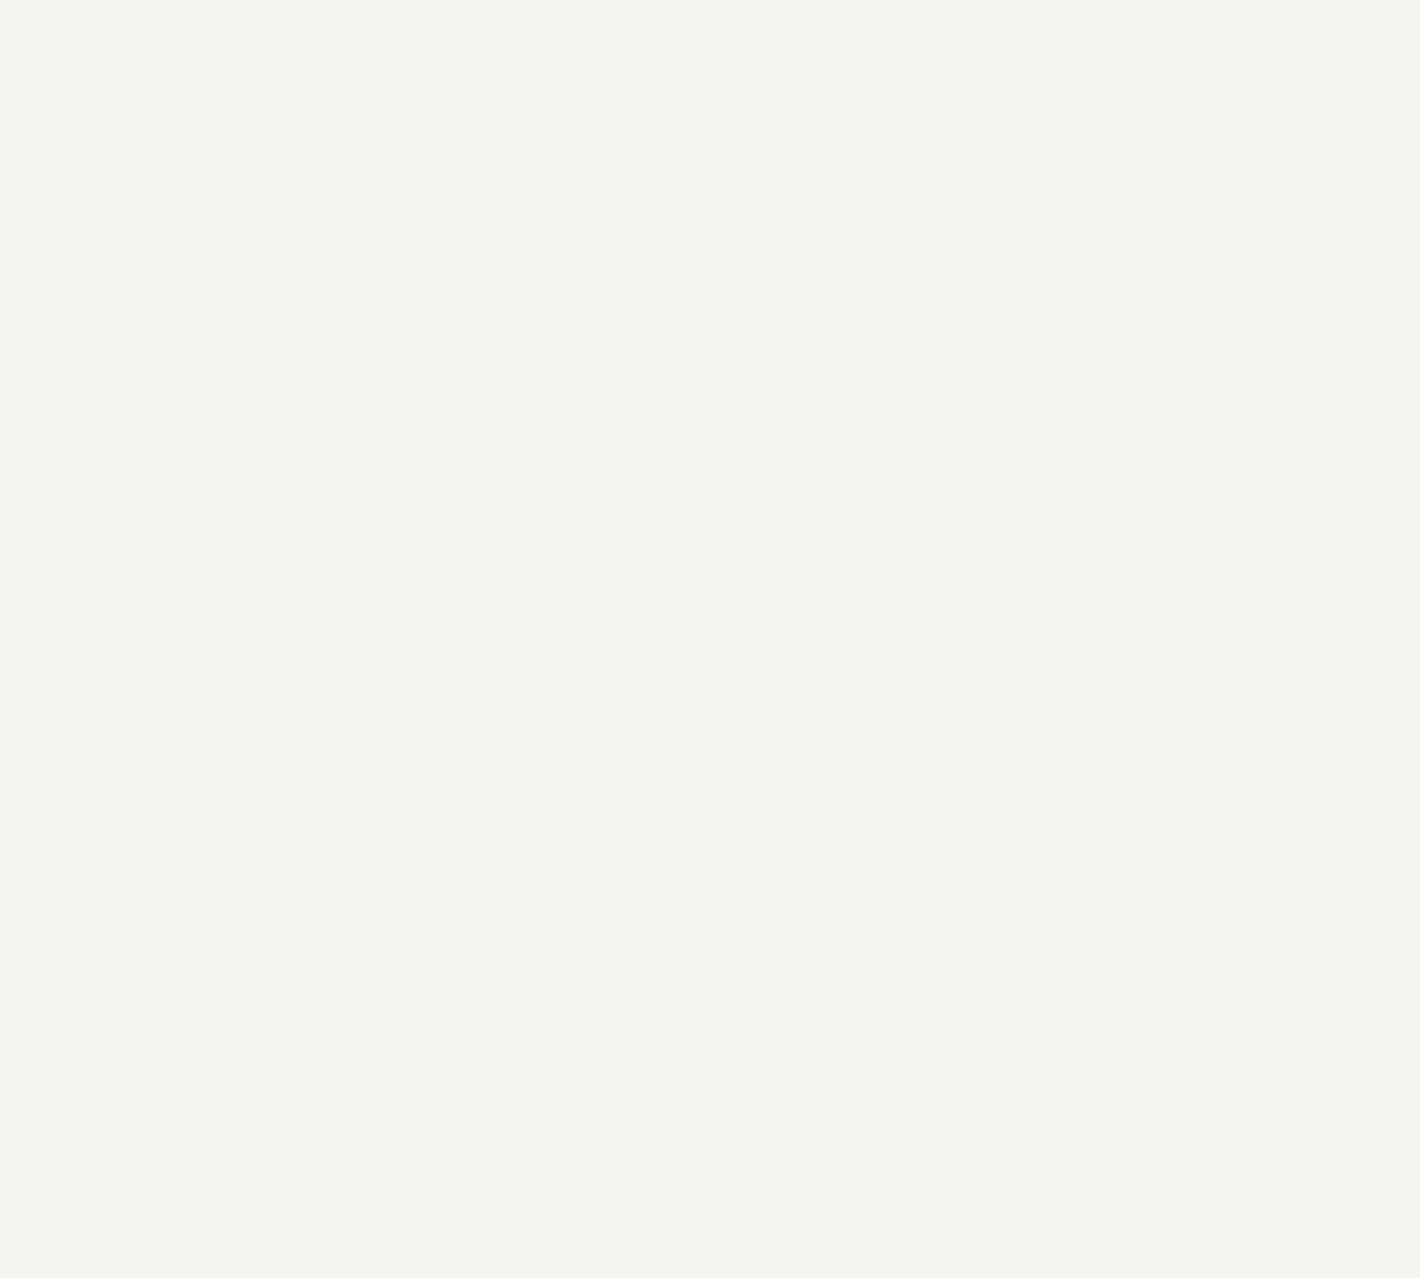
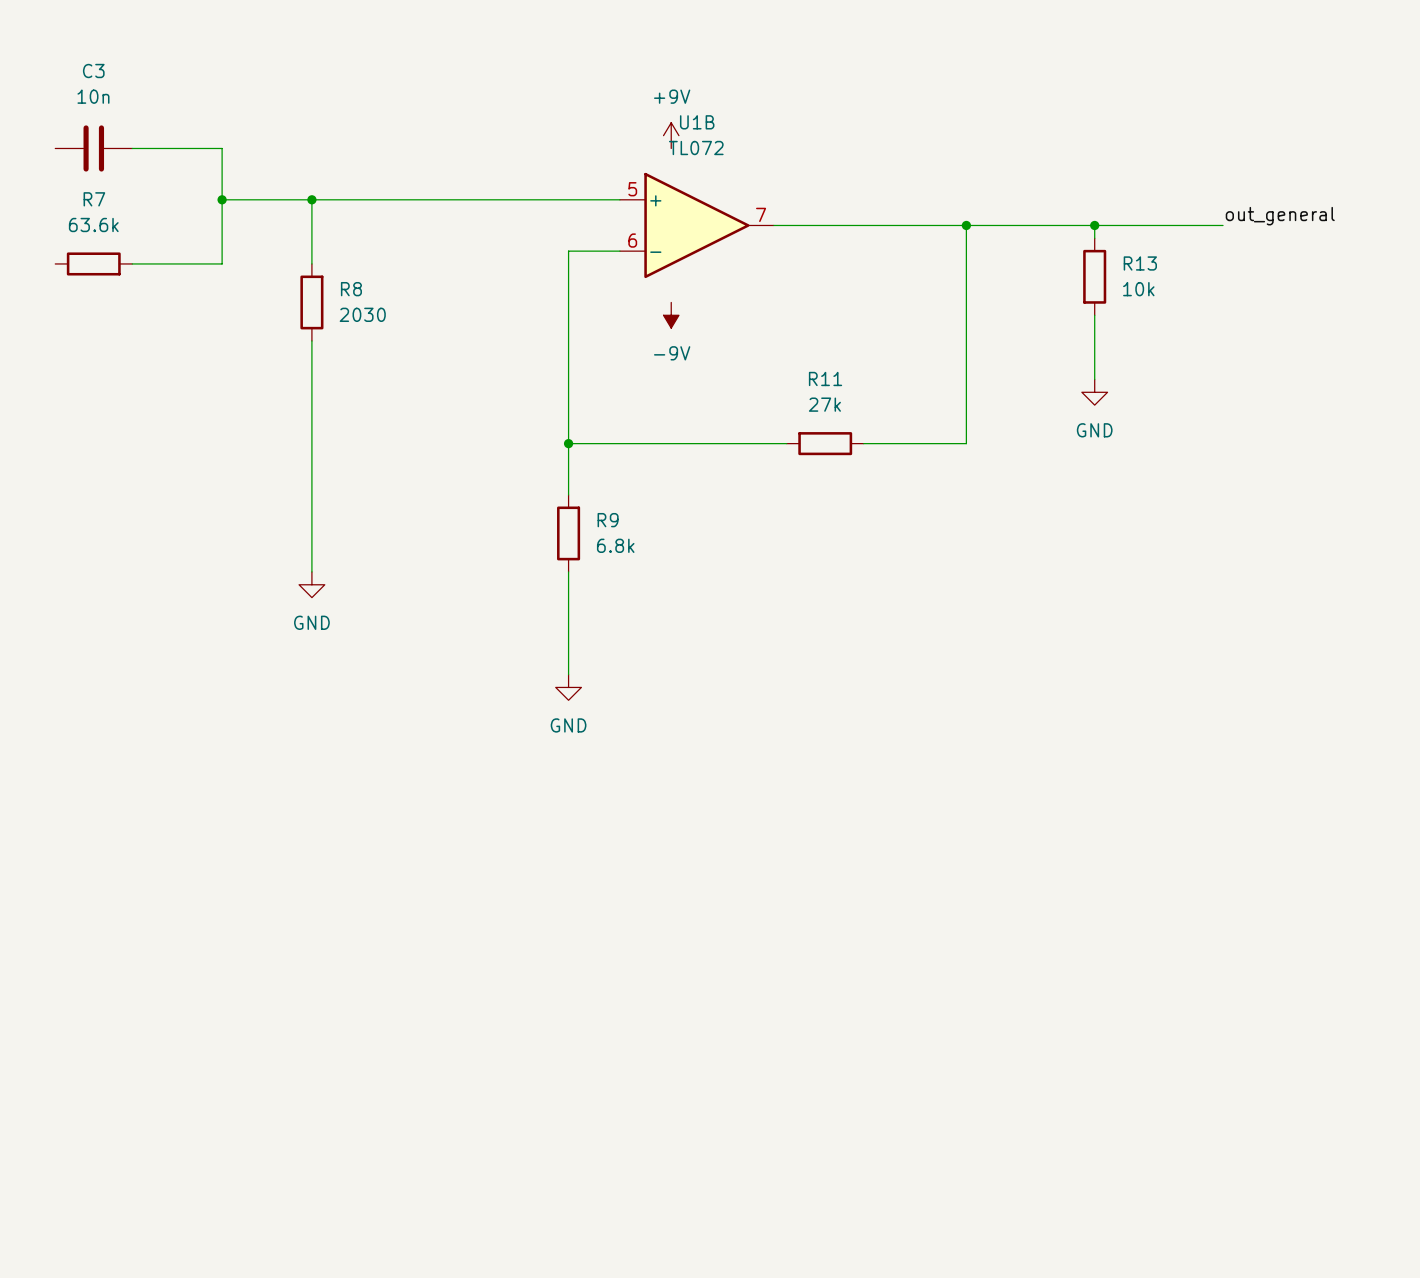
power symbol: none -> +9V (671, 135)
C3: none -> 10n (93, 148)
wire: none -> (132, 148) (222, 148) (222, 263) (132, 263)
wire: none -> (222, 199) (619, 199)
junction: none -> (222, 199)
wire: none -> (311, 199) (311, 263)
junction: none -> (311, 199)
label: none -> out_general (1280, 216)
U1B: none -> TL072 (696, 225)
wire: none -> (773, 225) (1223, 225)
wire: none -> (966, 225) (966, 443) (863, 443)
junction: none -> (966, 225)
wire: none -> (1094, 225) (1094, 238)
junction: none -> (1094, 225)
wire: none -> (619, 251) (568, 251) (568, 494)
R7: none -> 63.6k (93, 263)
R13: none -> 10k (1094, 276)
R8: none -> 2030 (311, 302)
power symbol: none -> -9V (671, 315)
wire: none -> (1094, 315) (1094, 379)
wire: none -> (311, 340) (311, 571)
power symbol: none -> GND (1094, 392)
wire: none -> (568, 443) (786, 443)
junction: none -> (568, 443)
R11: none -> 27k (825, 443)
R9: none -> 6.8k (568, 533)
wire: none -> (568, 571) (568, 674)
power symbol: none -> GND (311, 584)
power symbol: none -> GND (568, 687)

